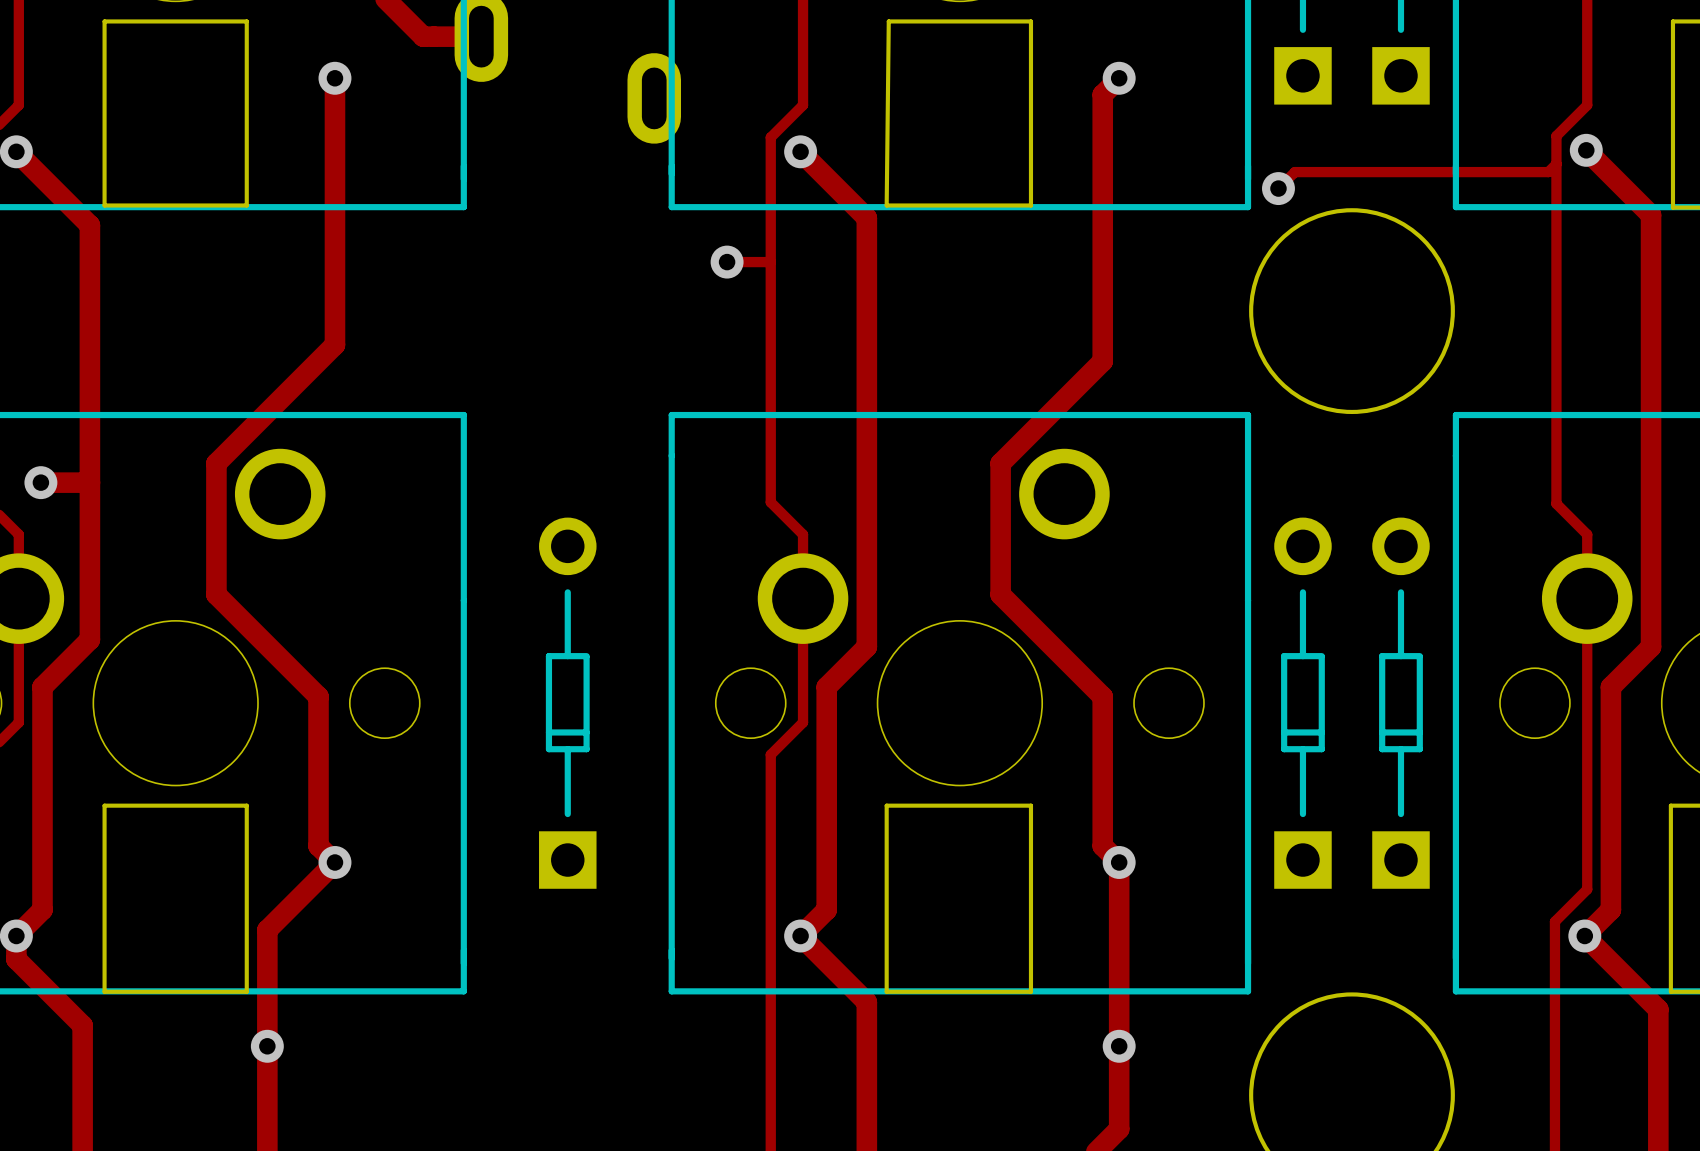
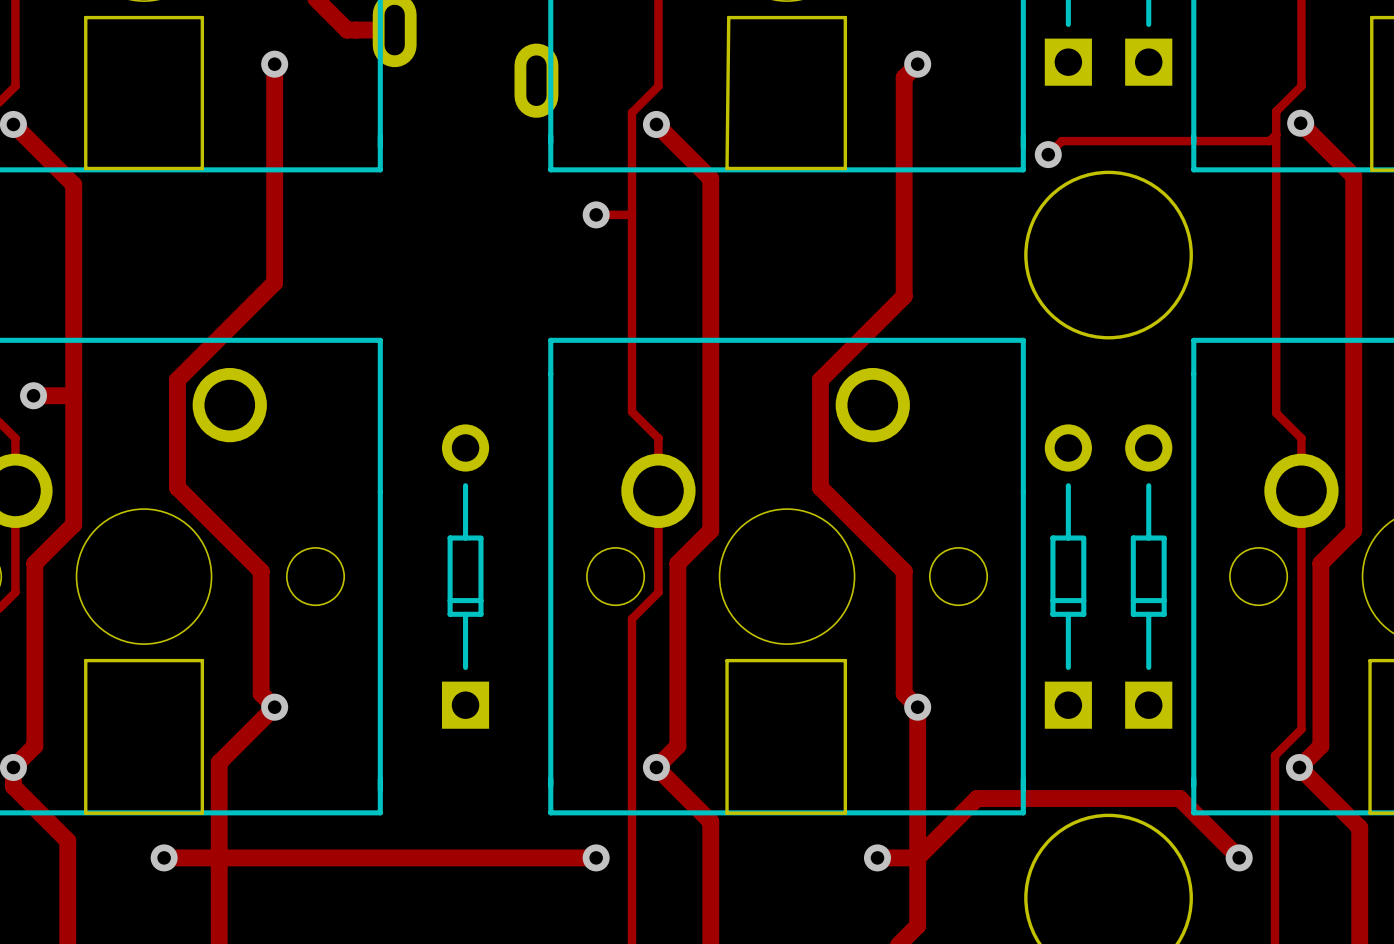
track: none -> (164, 857) (596, 857)
via position: (267, 1046) -> (164, 857)
via: none -> (596, 857)
track: none -> (877, 857) (917, 857) (977, 798) (1179, 798) (1239, 857)
via position: (1119, 1046) -> (877, 857)
via: none -> (1239, 857)

